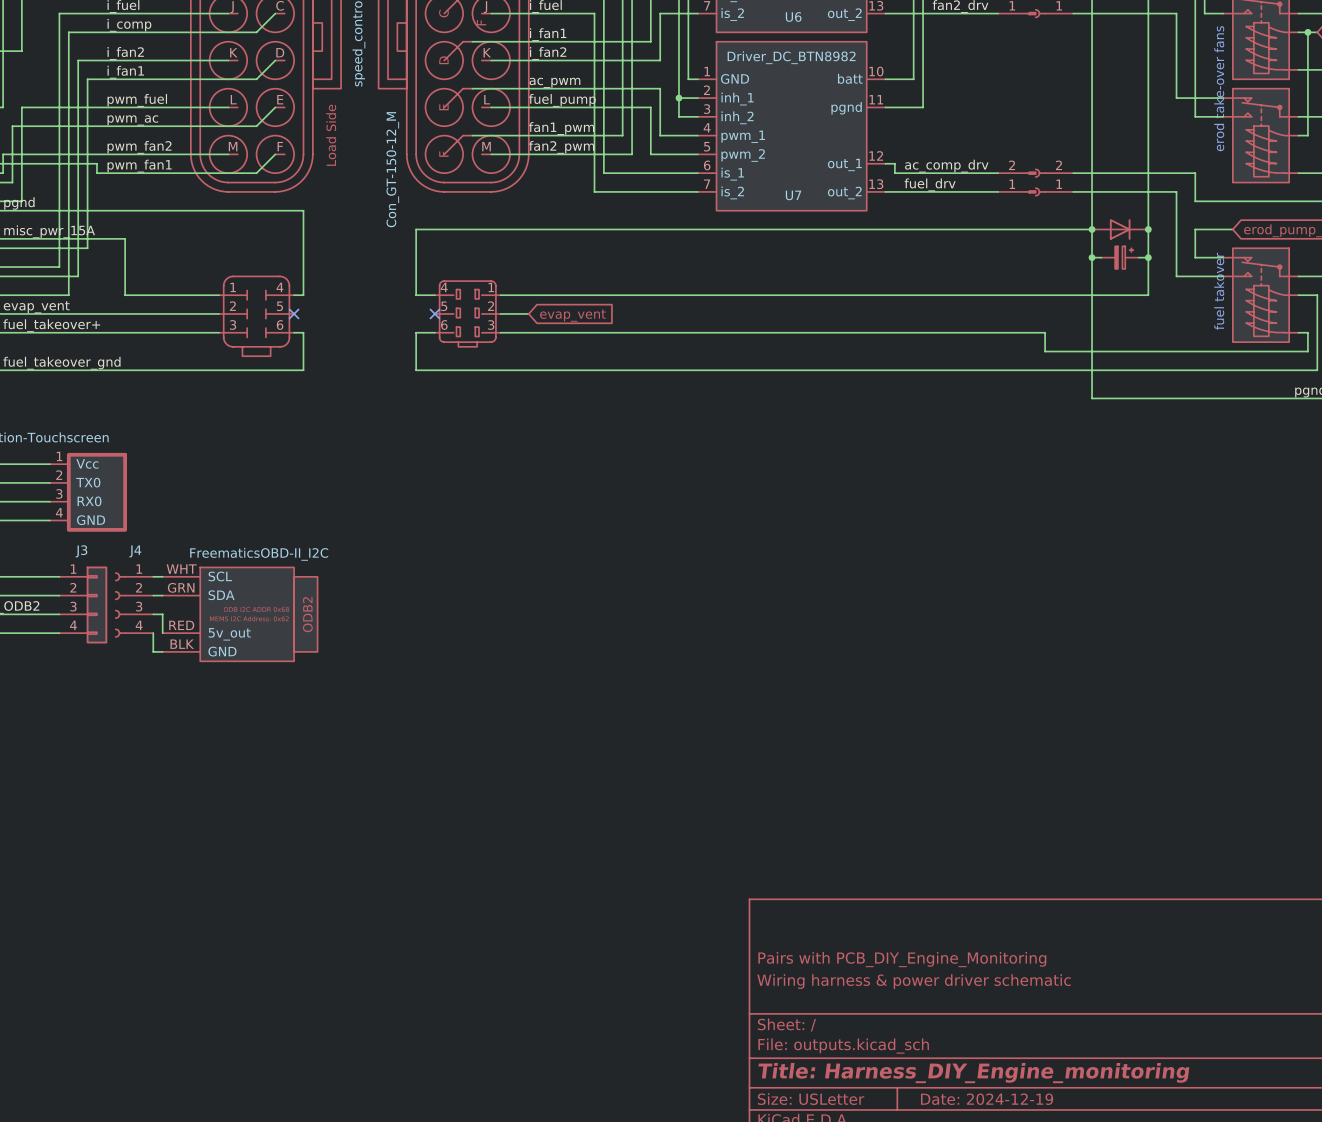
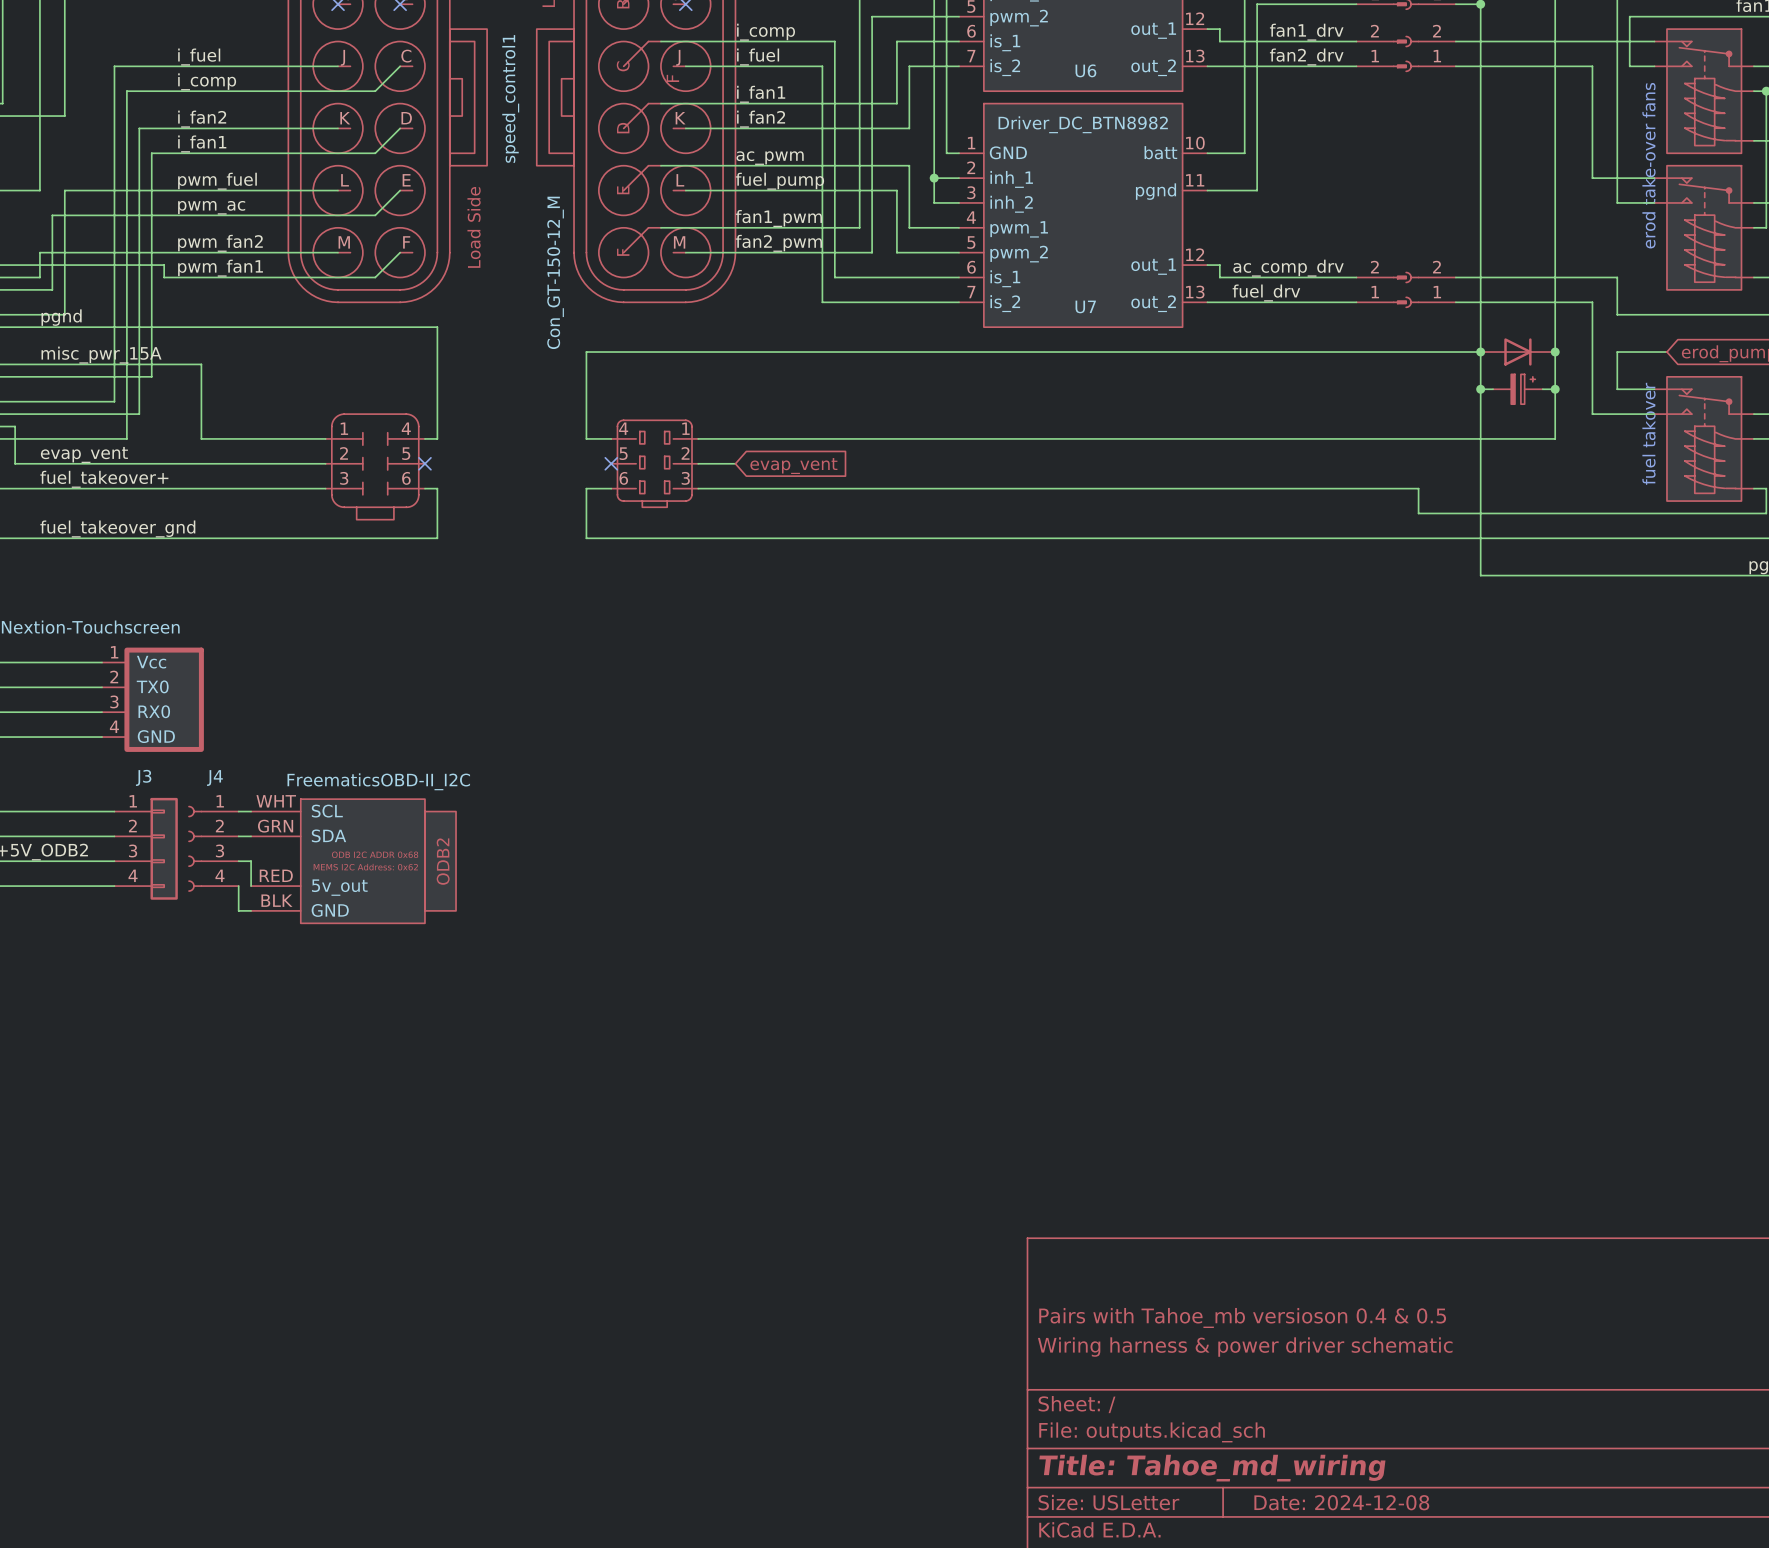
title block: Pairs with PCB_DIY_Engine_Monitoring (902, 959) -> Pairs with Tahoe_mb versioson 0.4 & 0.5 (1242, 1317)
title block: Title: Harness_DIY_Engine_monitoring (973, 1073) -> Title: Tahoe_md_wiring (1212, 1468)
title block: Date: 2024-12-19 (987, 1099) -> Date: 2024-12-08 (1341, 1502)

